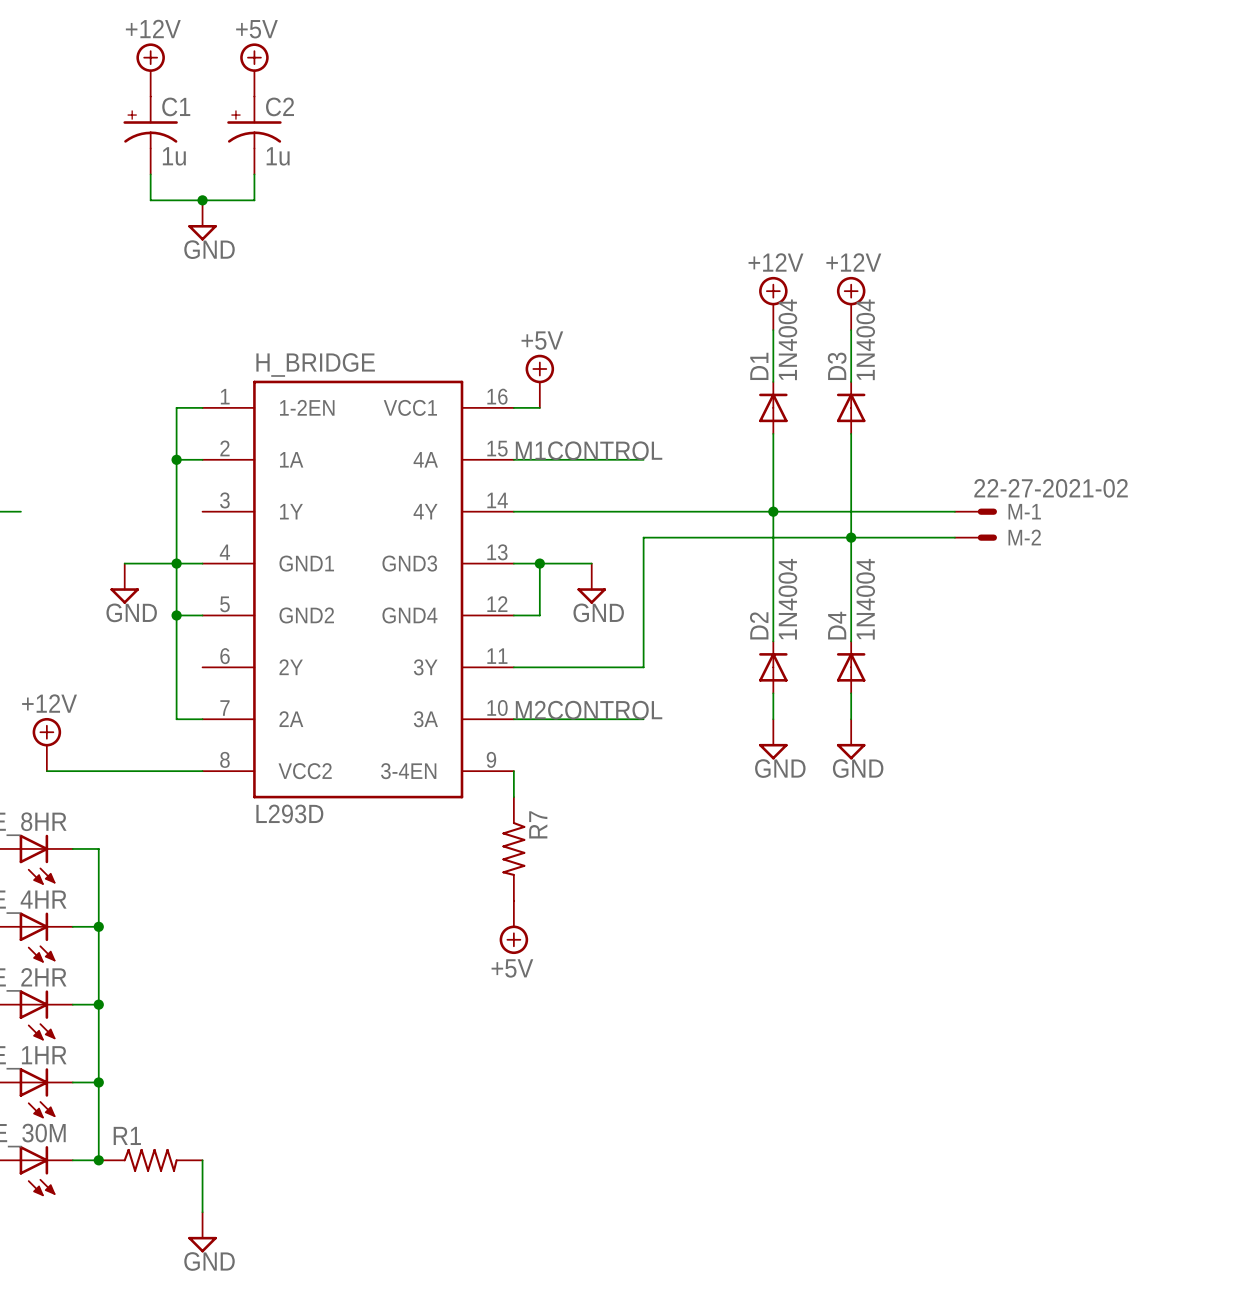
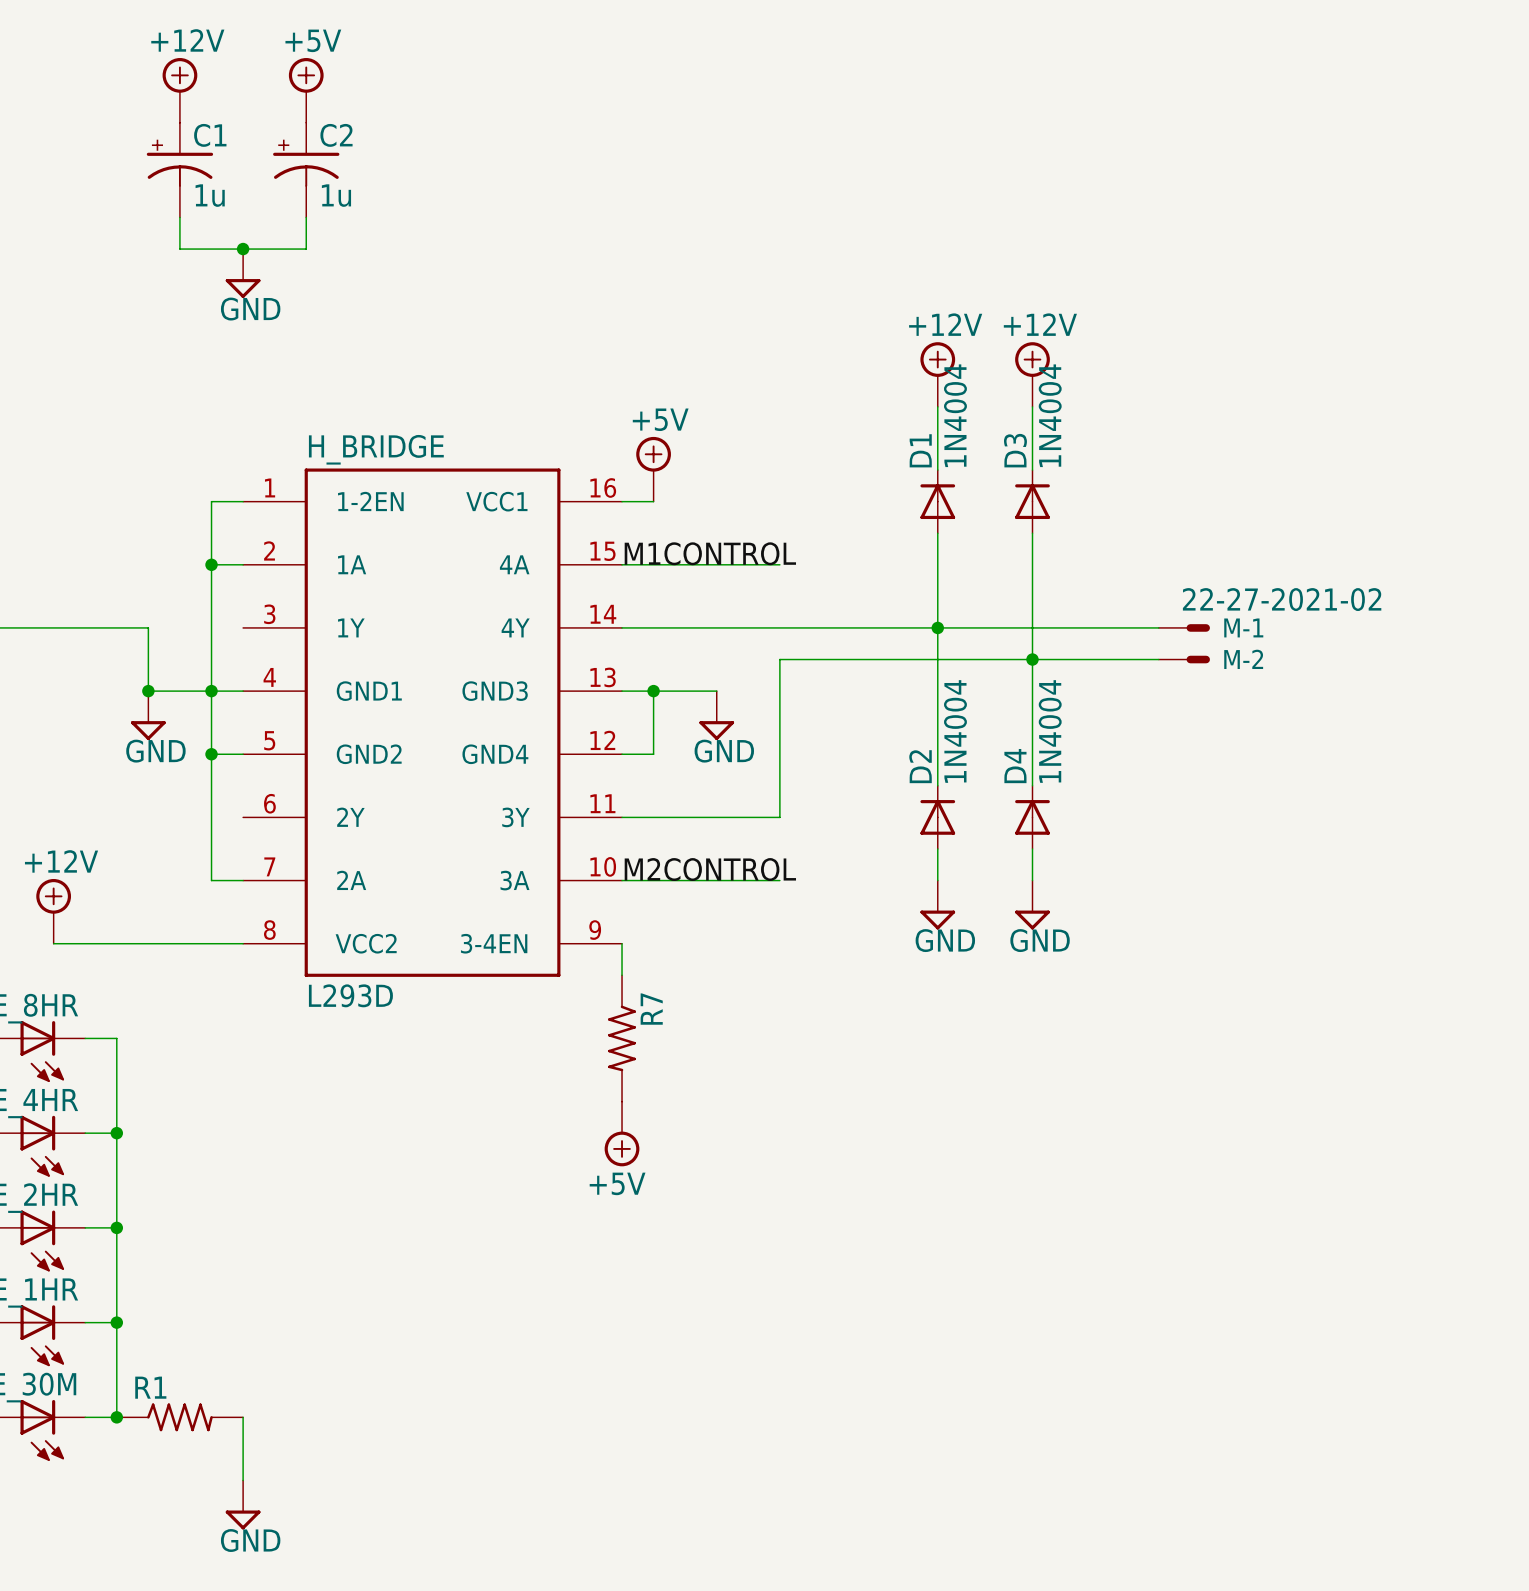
wire: none -> (22, 627) (148, 627) (148, 691)
junction: none -> (148, 691)

